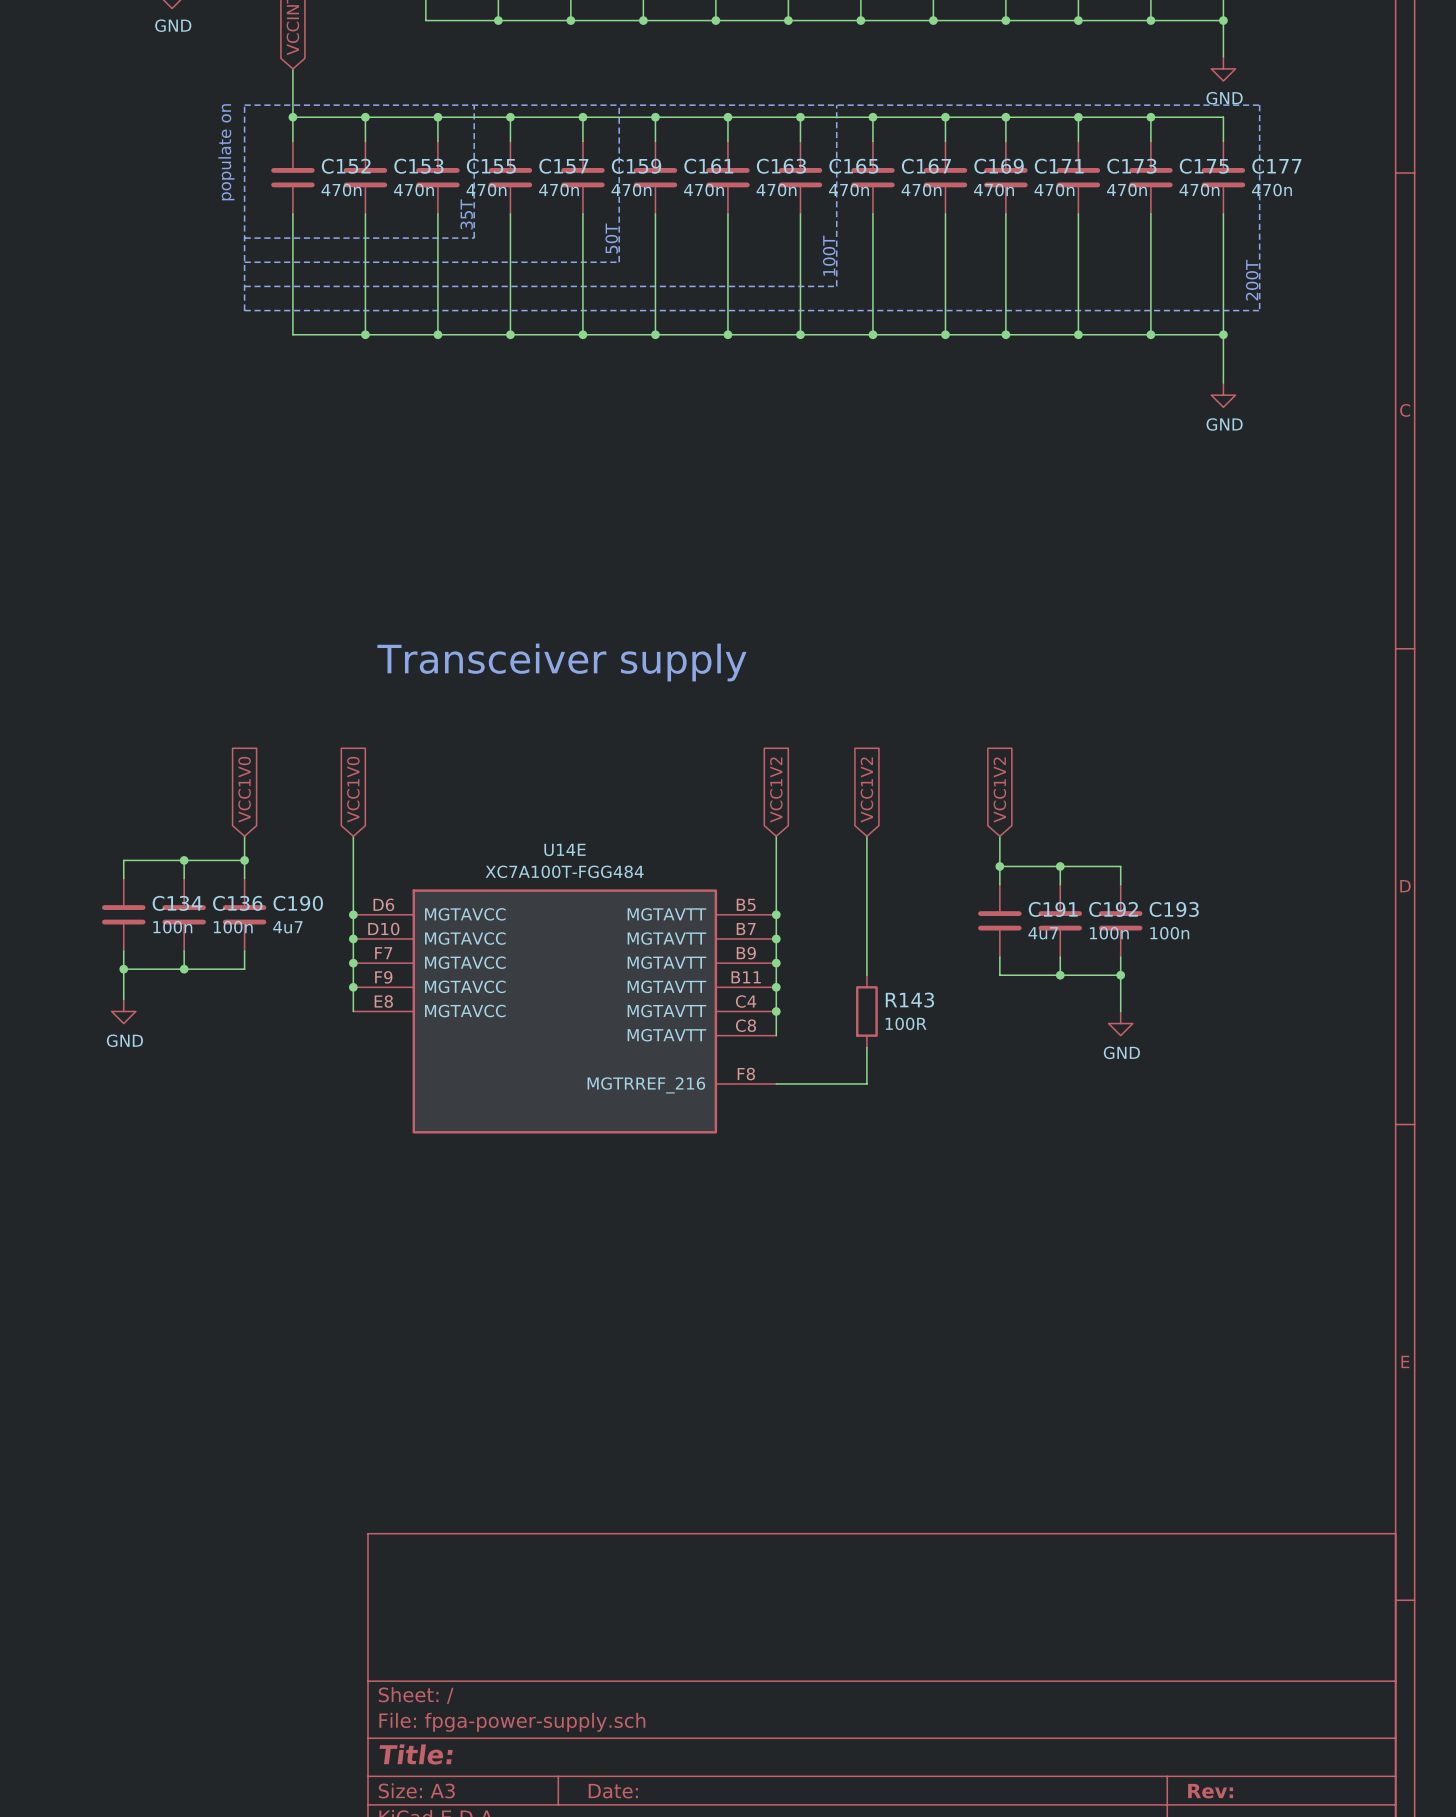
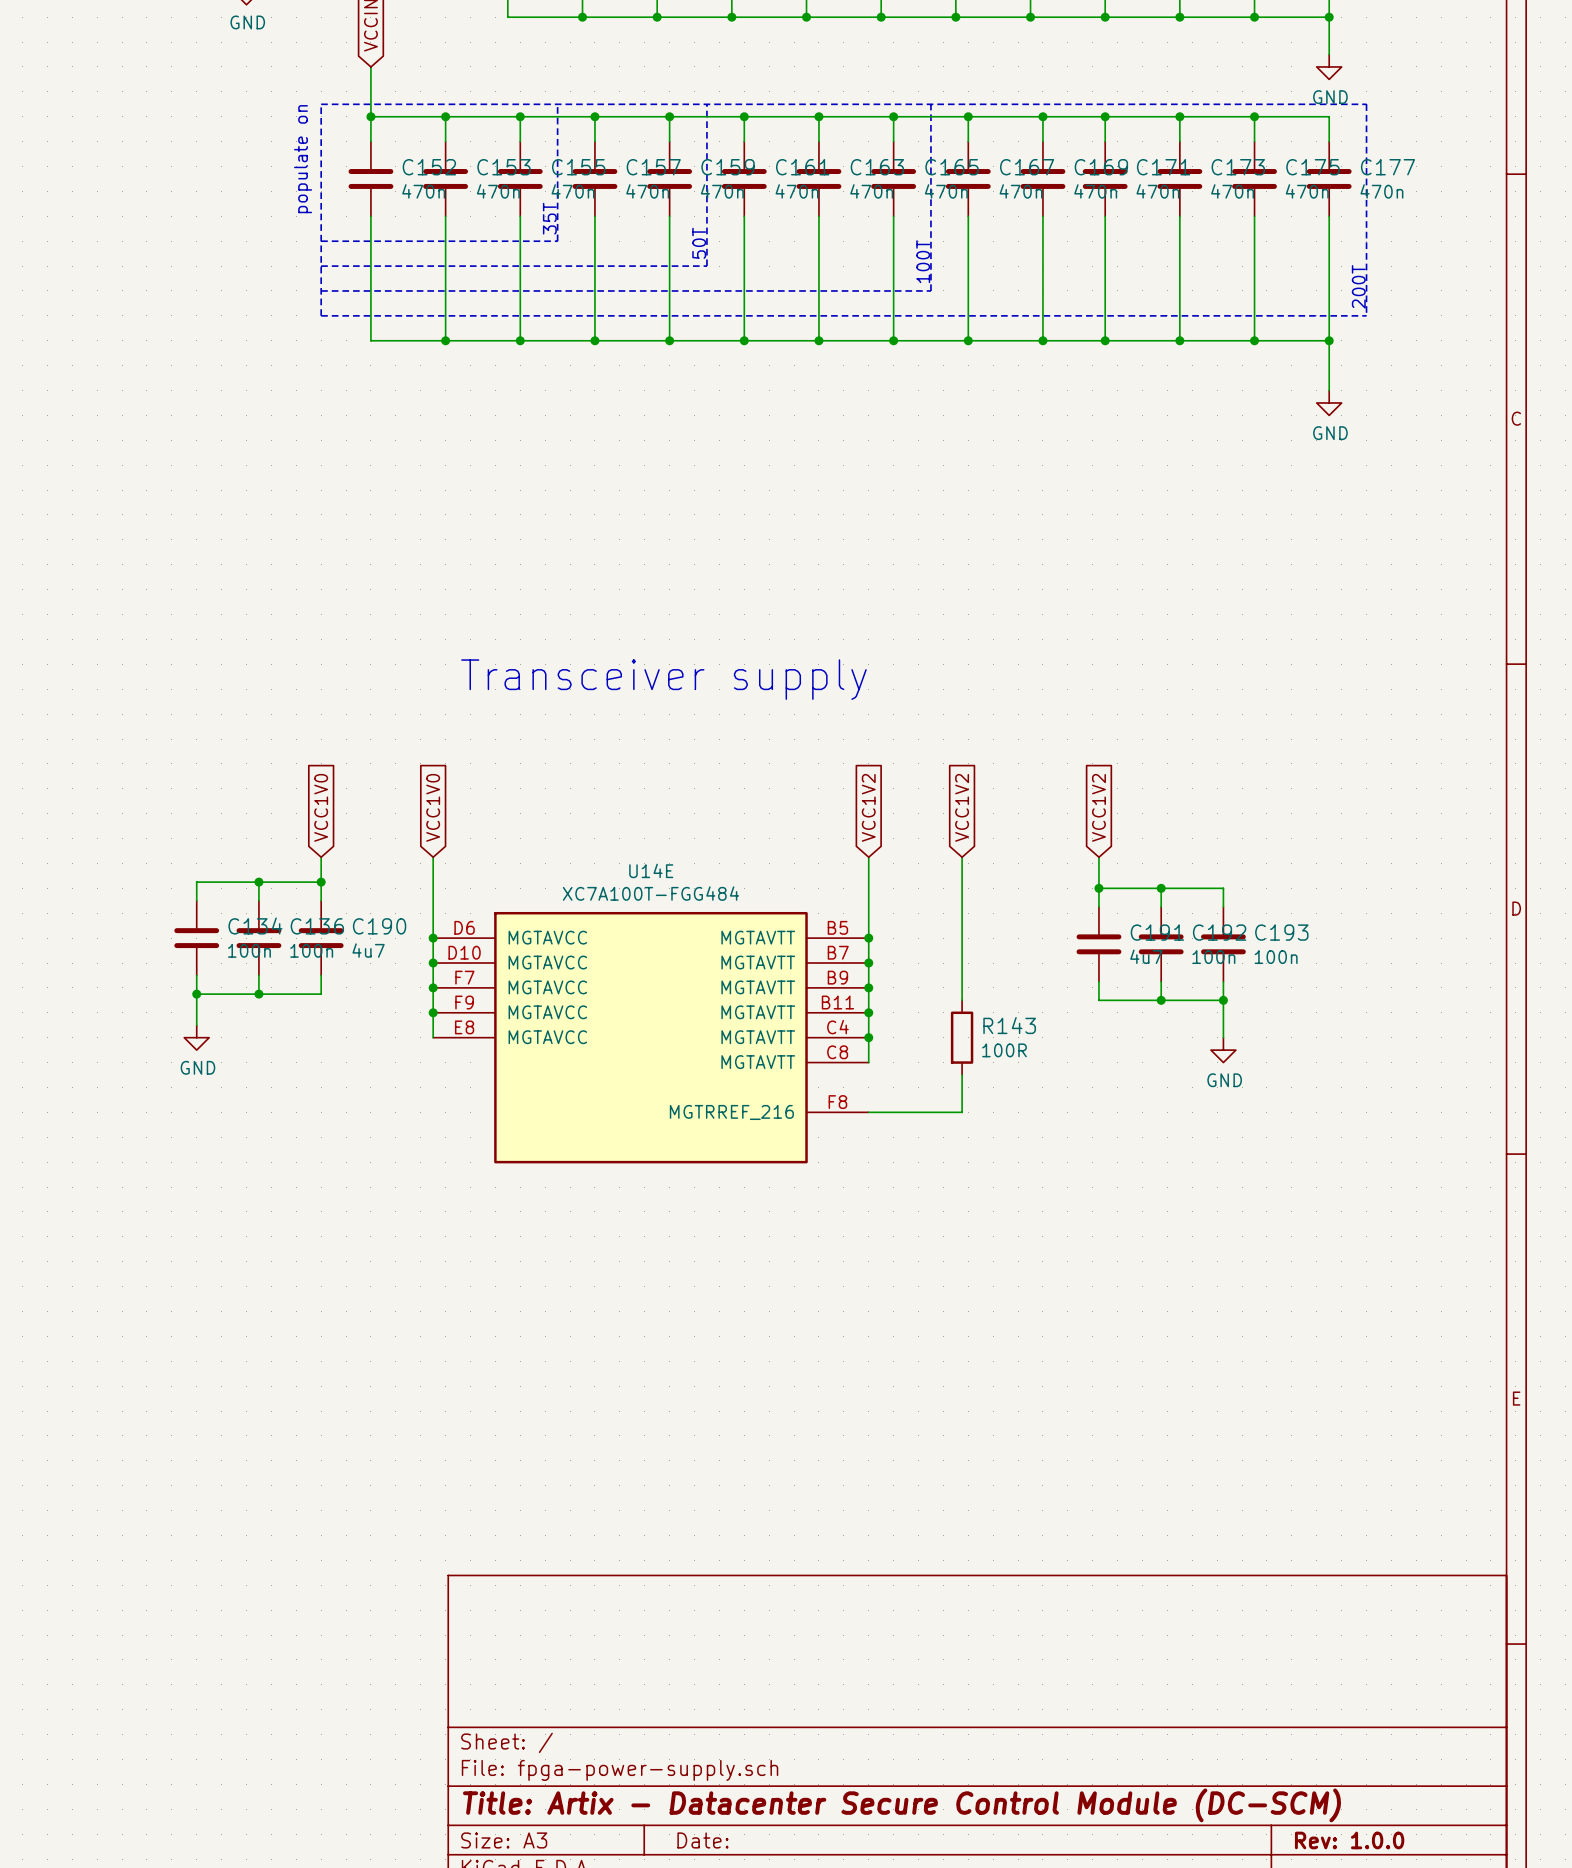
title block: Title: (416, 1754) -> Title: Artix - Datacenter Secure Control Module (DC-SCM) (902, 1805)
title block: Rev: (1210, 1791) -> Rev: 1.0.0 (1349, 1840)

